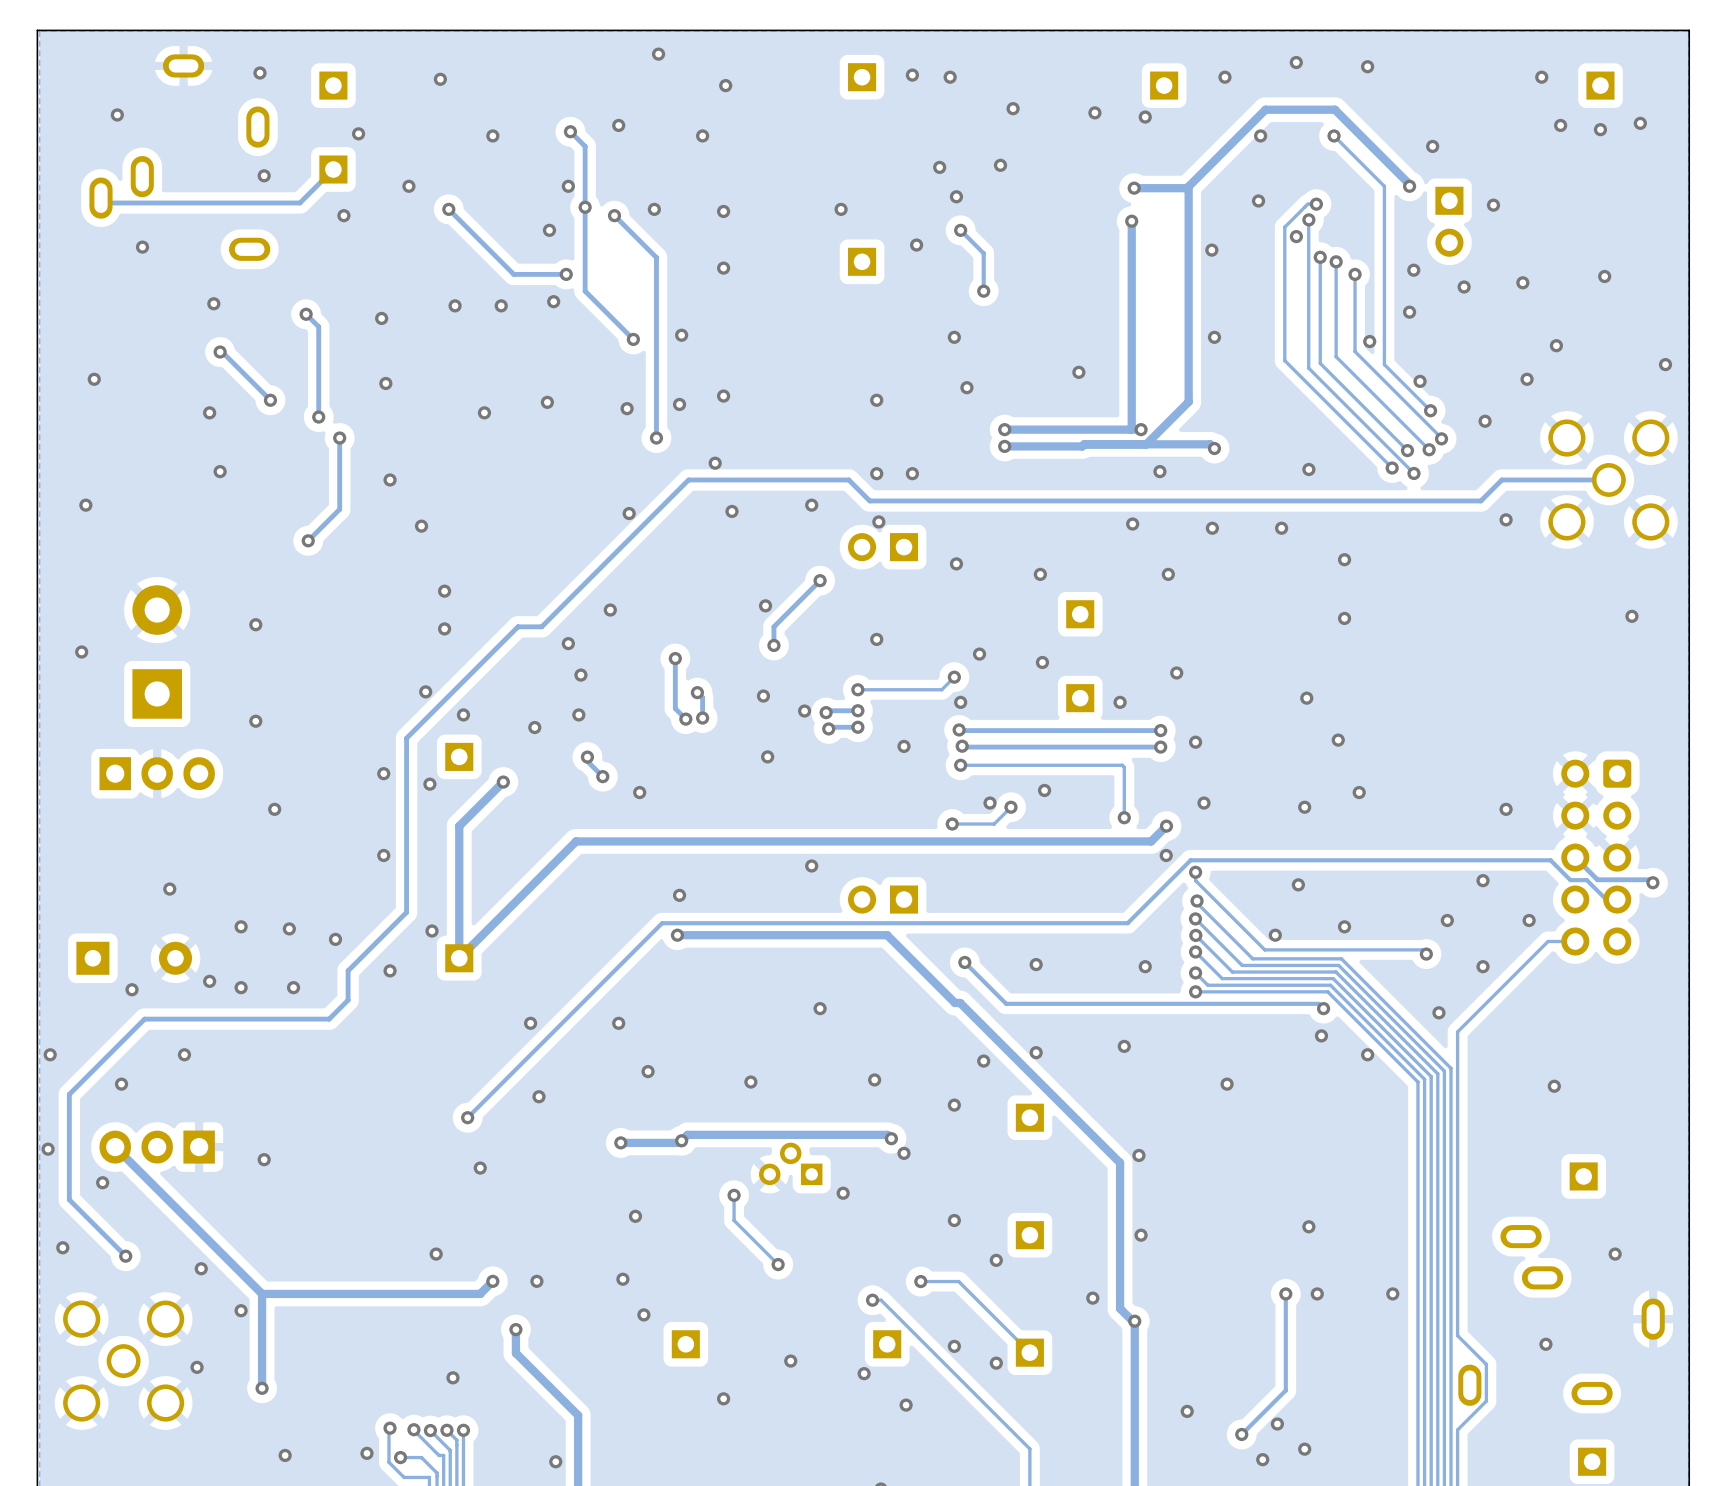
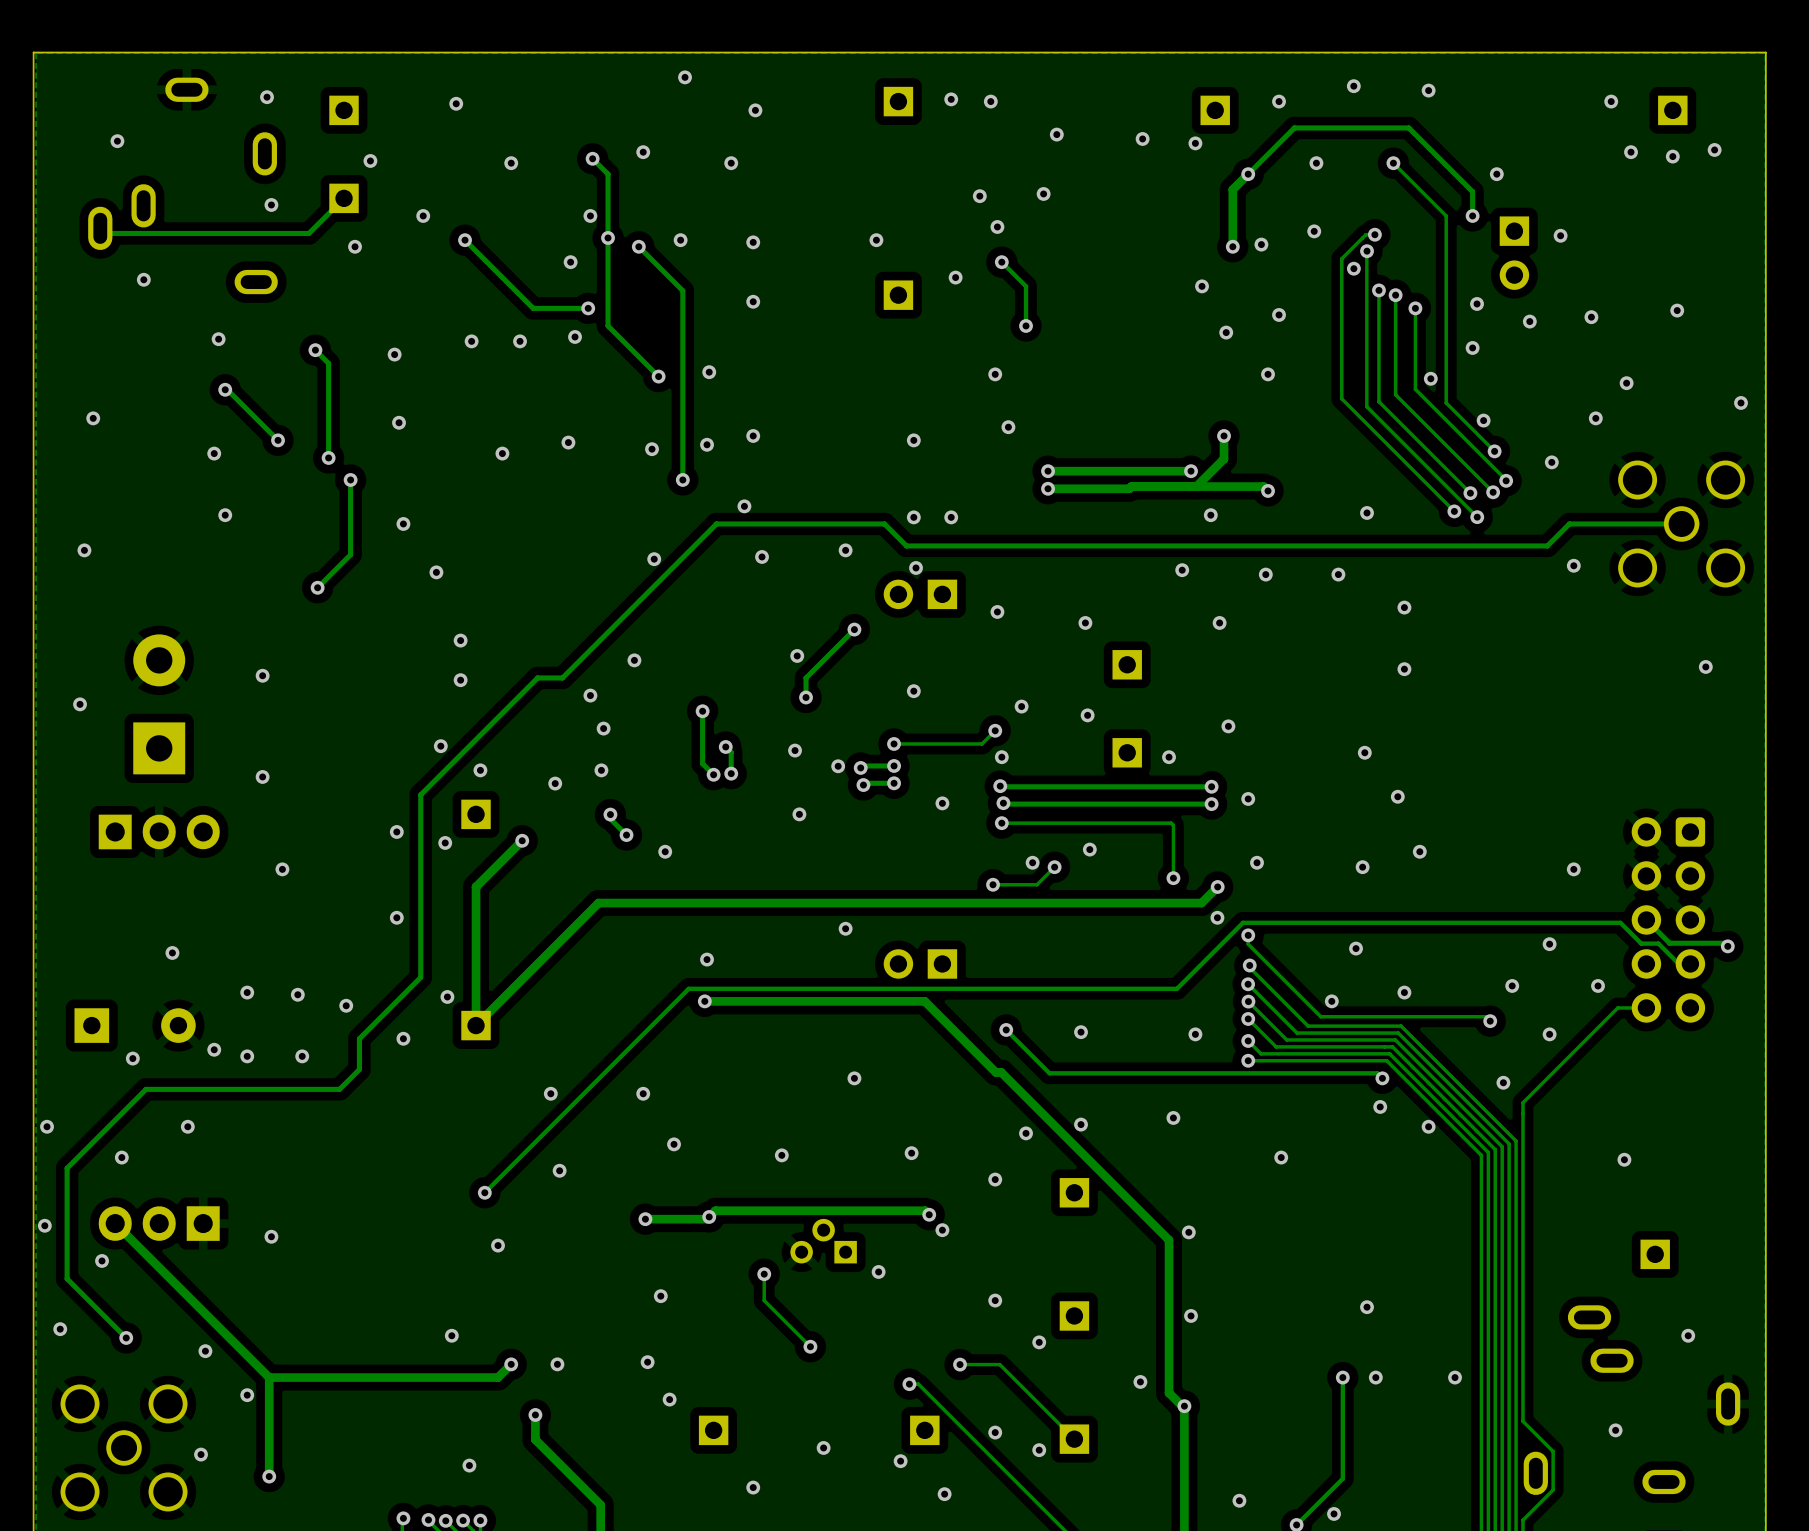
via: none -> (1248, 174)
track: (1409, 184) (1334, 109) (1265, 109) (1187, 188) (1134, 188) -> (1472, 213) (1472, 191) (1408, 127) (1294, 127) (1232, 189) (1232, 246)
track: (1188, 186) (1188, 401) (1172, 418) -> (1224, 435) (1224, 458)
via: (1134, 188) -> none
via: none -> (1261, 244)
via: none -> (1232, 246)
track: (1131, 221) (1130, 429) -> none
via: (1131, 221) -> none
via: (1211, 250) -> none
via: none -> (1202, 286)
via: none -> (1279, 314)
via: none -> (1226, 332)
via: (1078, 372) -> none
via: none -> (1224, 435)

